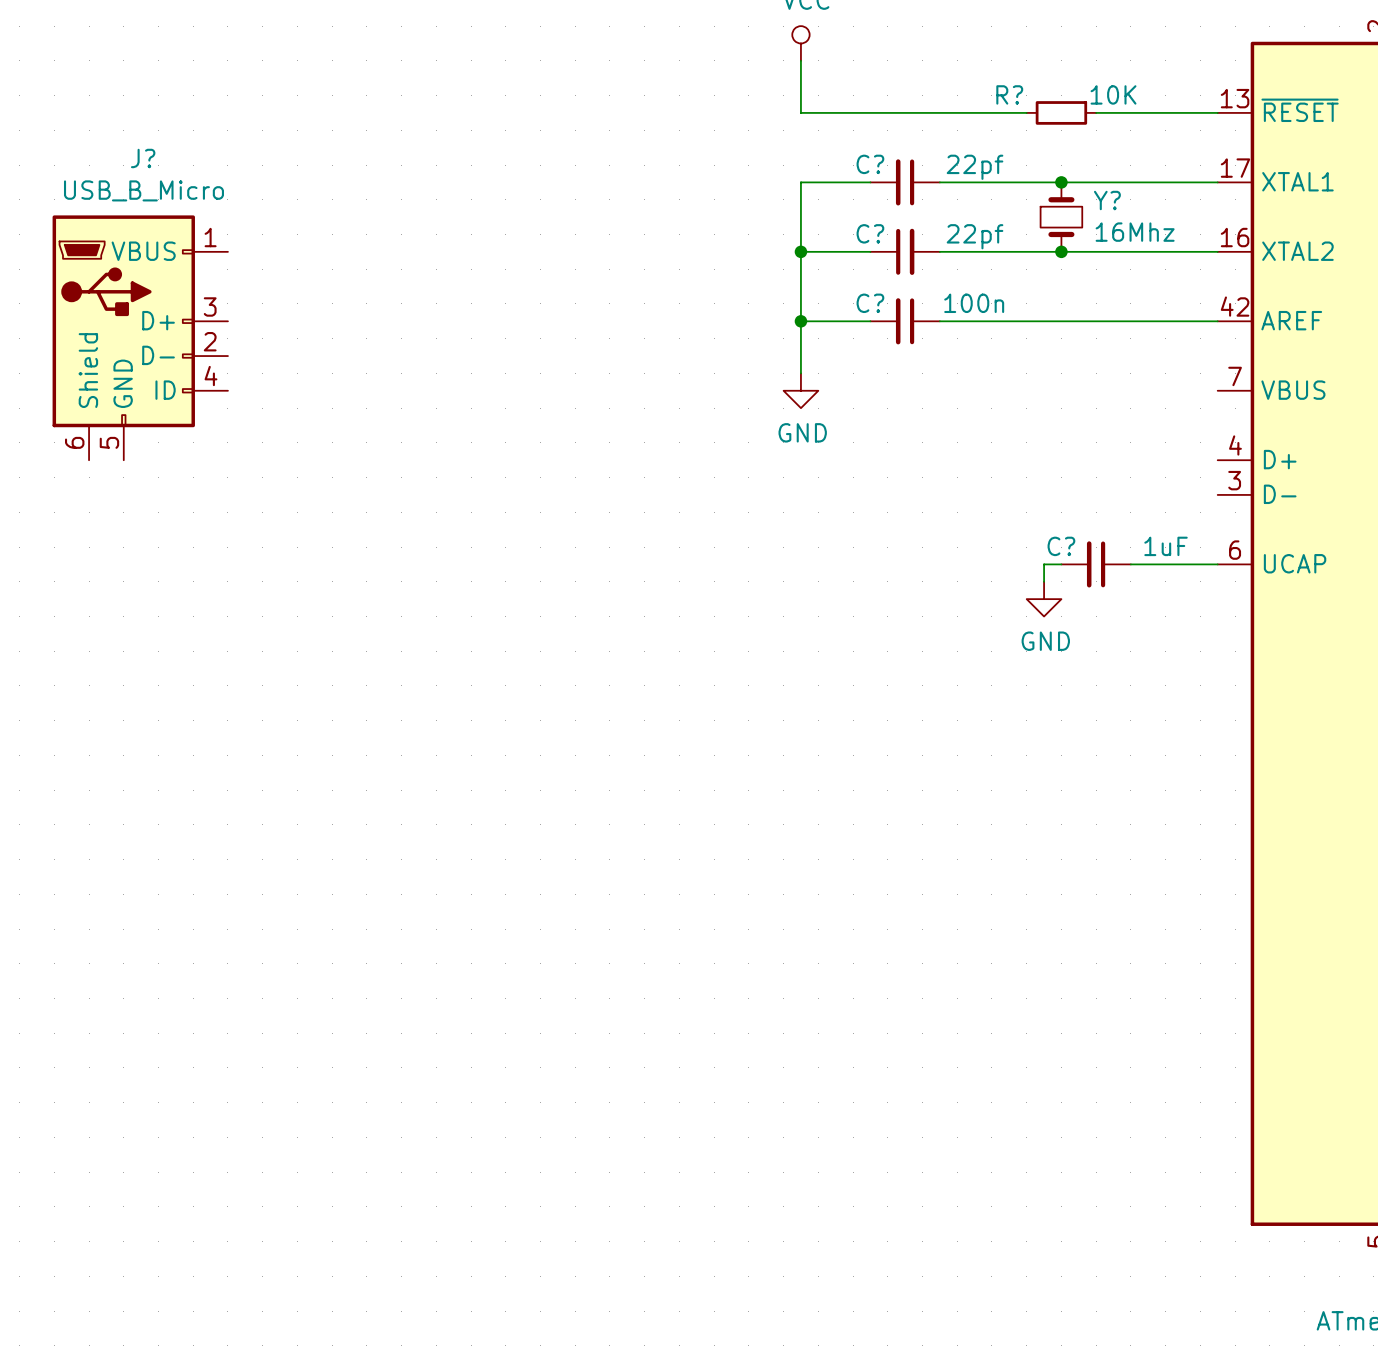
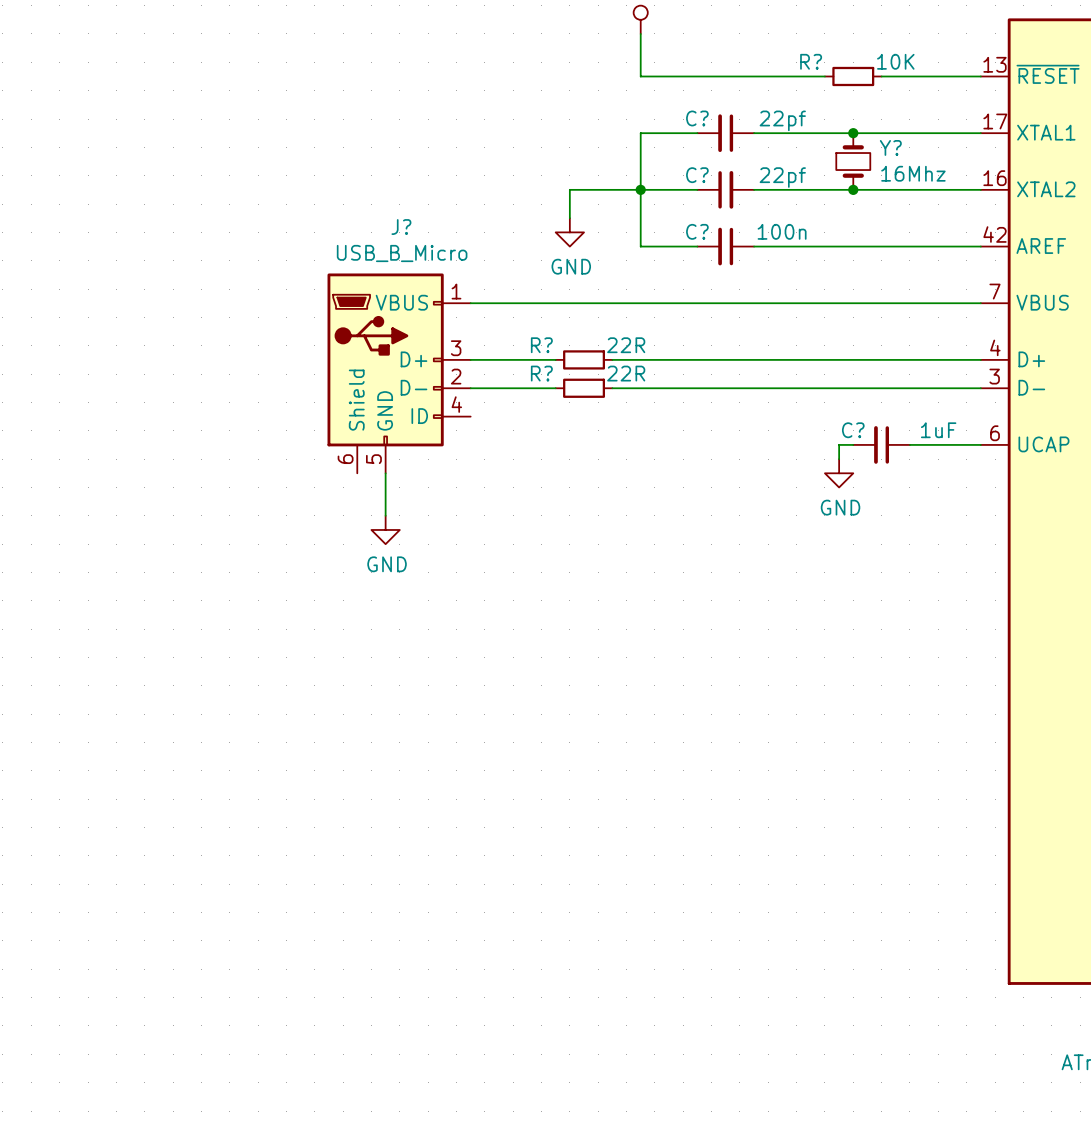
wire: none -> (640, 189) (569, 189) (569, 218)
wire: (800, 321) (800, 373) -> none
junction: (800, 321) -> none
J?: USB_B_Micro (140, 337) -> none
wire: none -> (470, 303) (980, 303)
power symbol position: GND (800, 390) -> GND (569, 232)
wire: none -> (470, 359) (555, 359)
R?: none -> 22R (584, 359)
wire: none -> (612, 359) (980, 359)
J?: none -> USB_B_Micro (399, 373)
wire: none -> (470, 388) (555, 388)
R?: none -> 22R (584, 388)
wire: none -> (612, 388) (980, 388)
wire: none -> (385, 473) (385, 515)
power symbol: none -> GND (385, 529)

